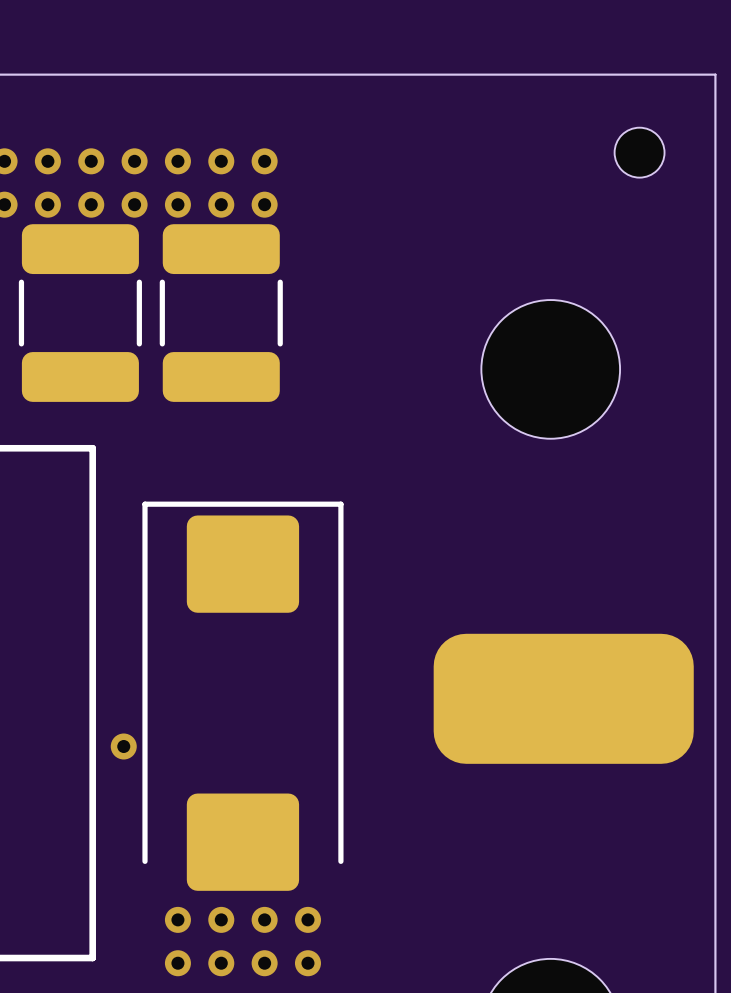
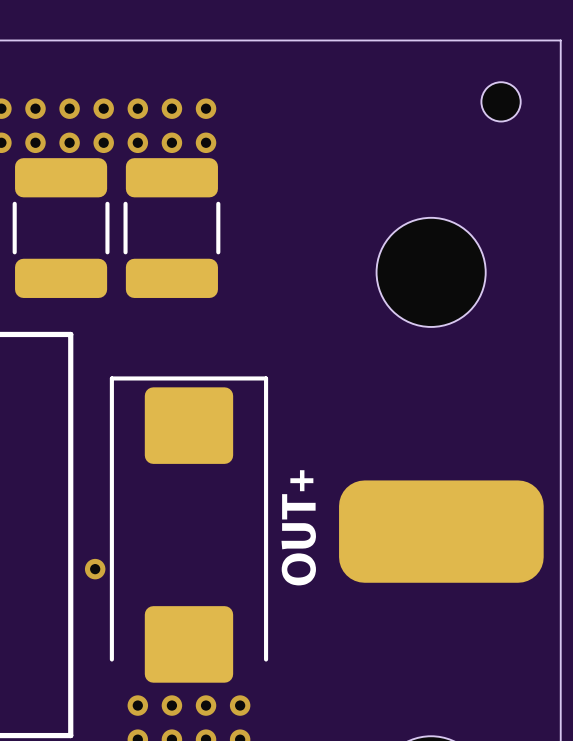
text: none -> OUT+ (298, 527)

